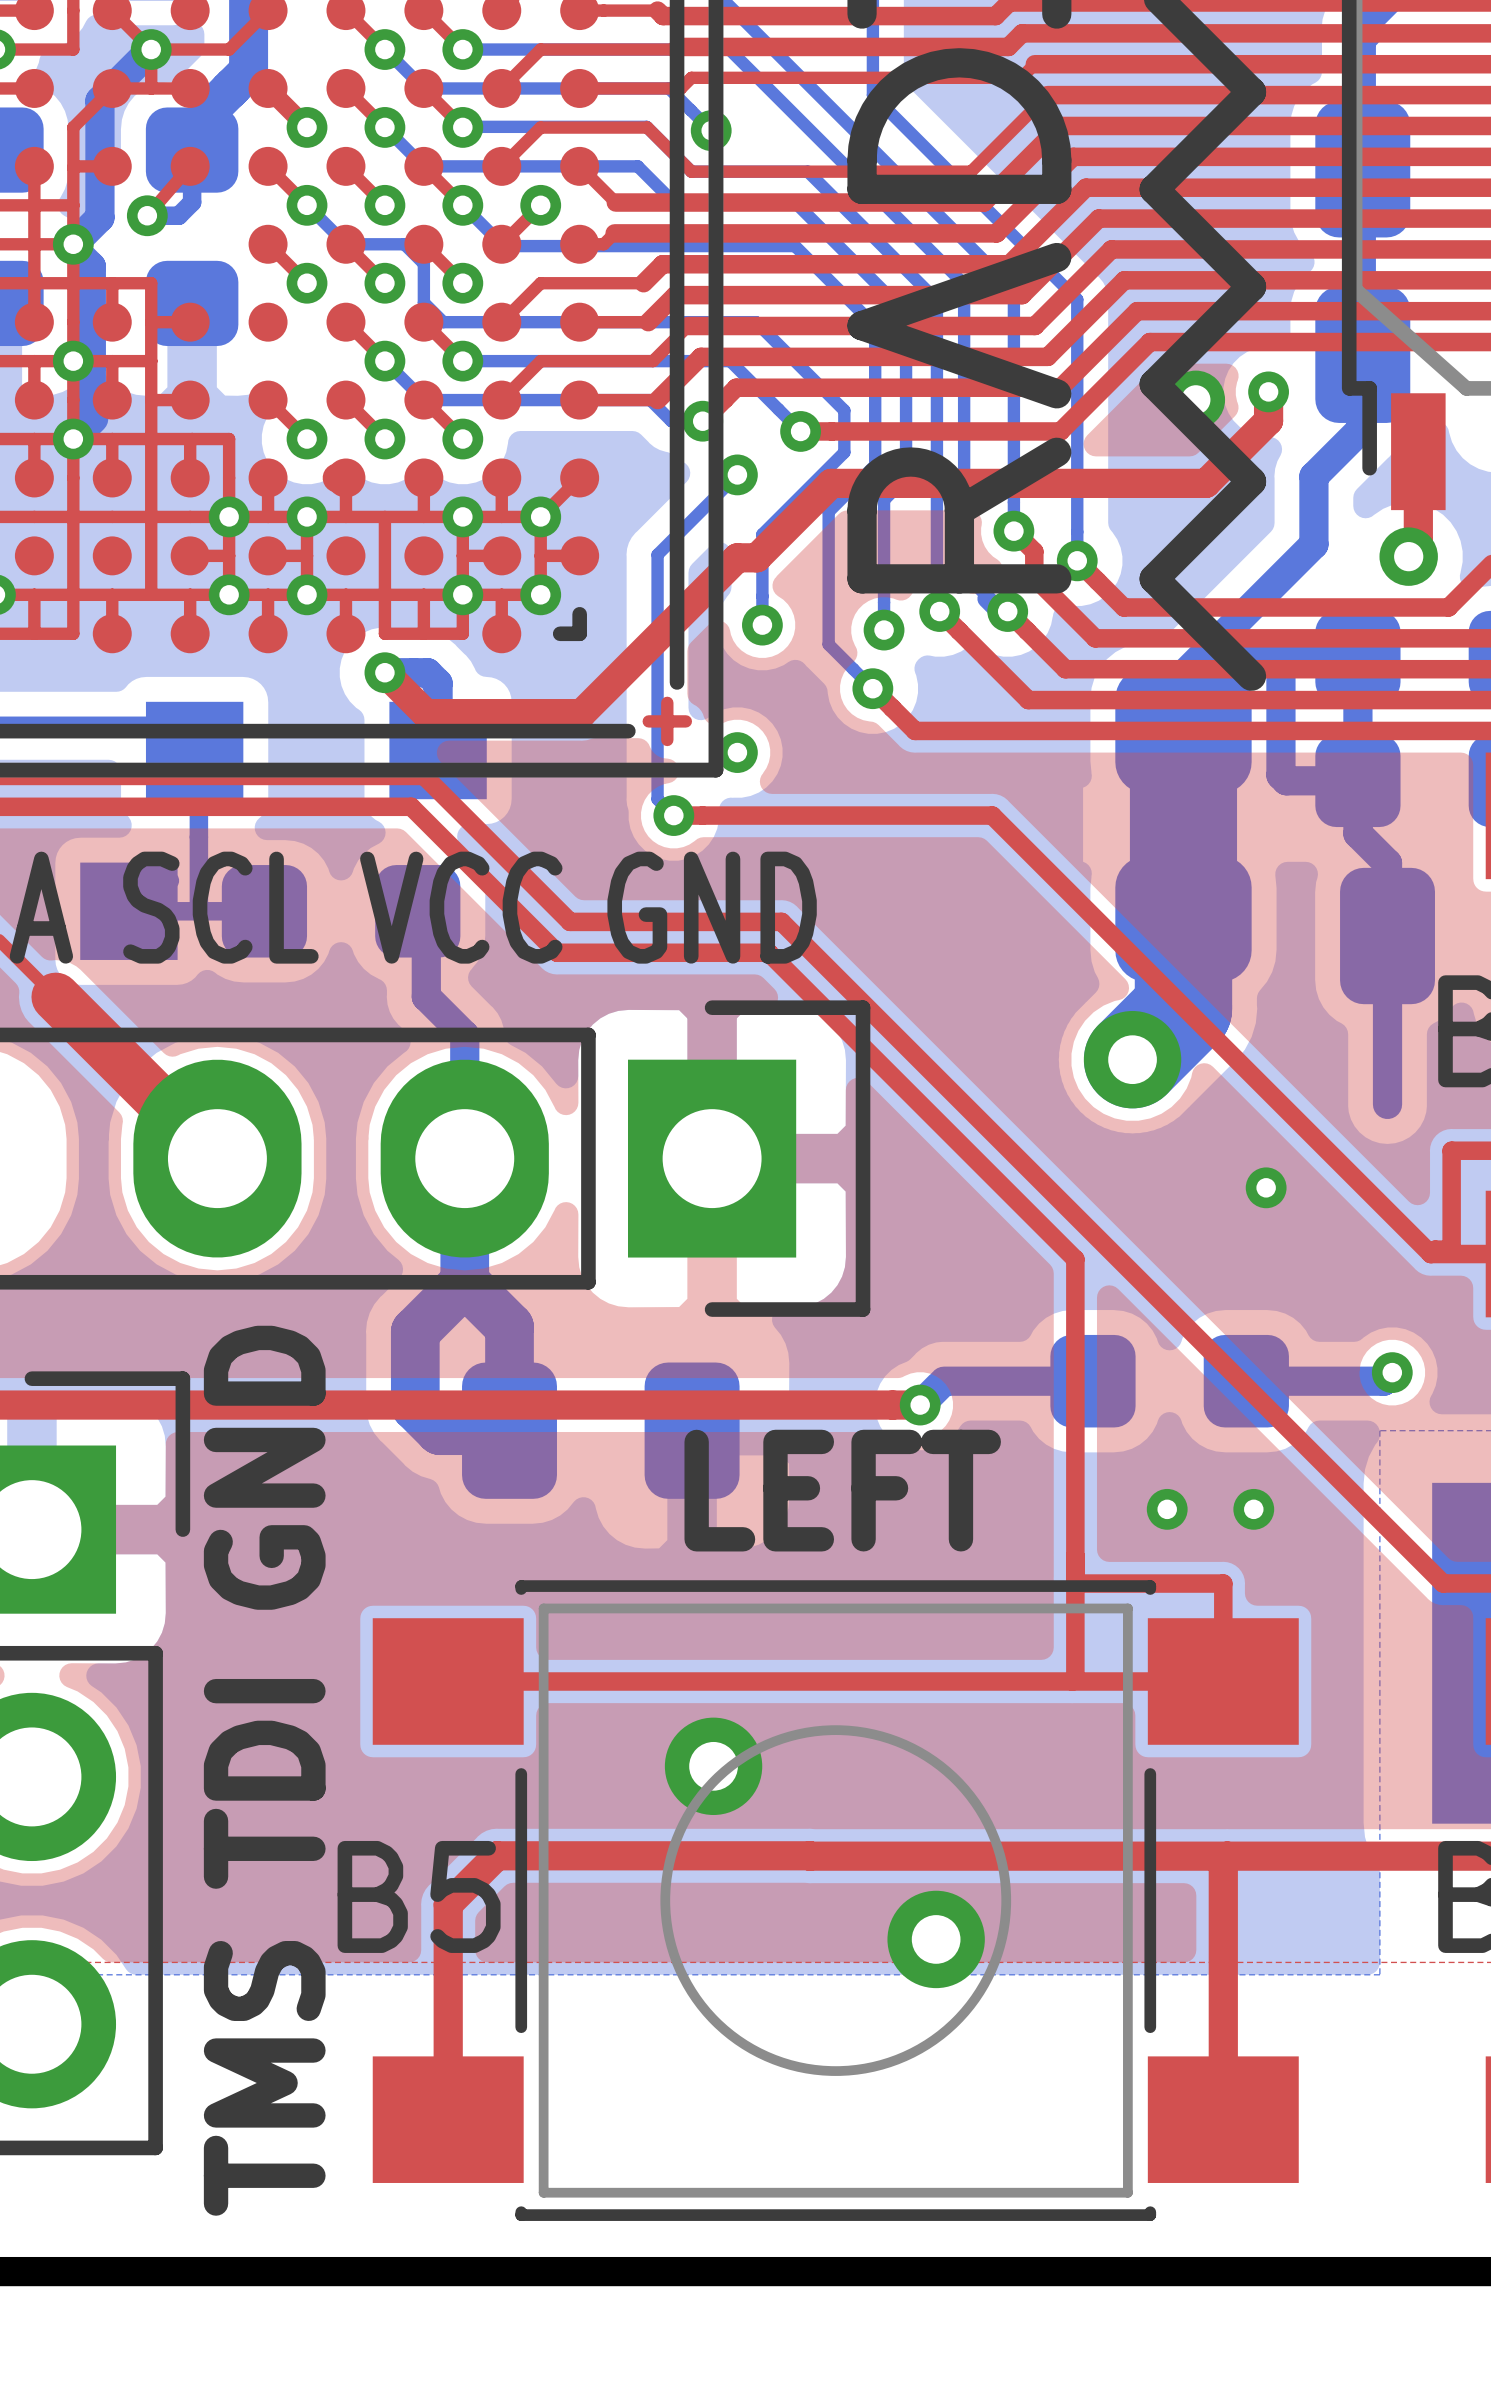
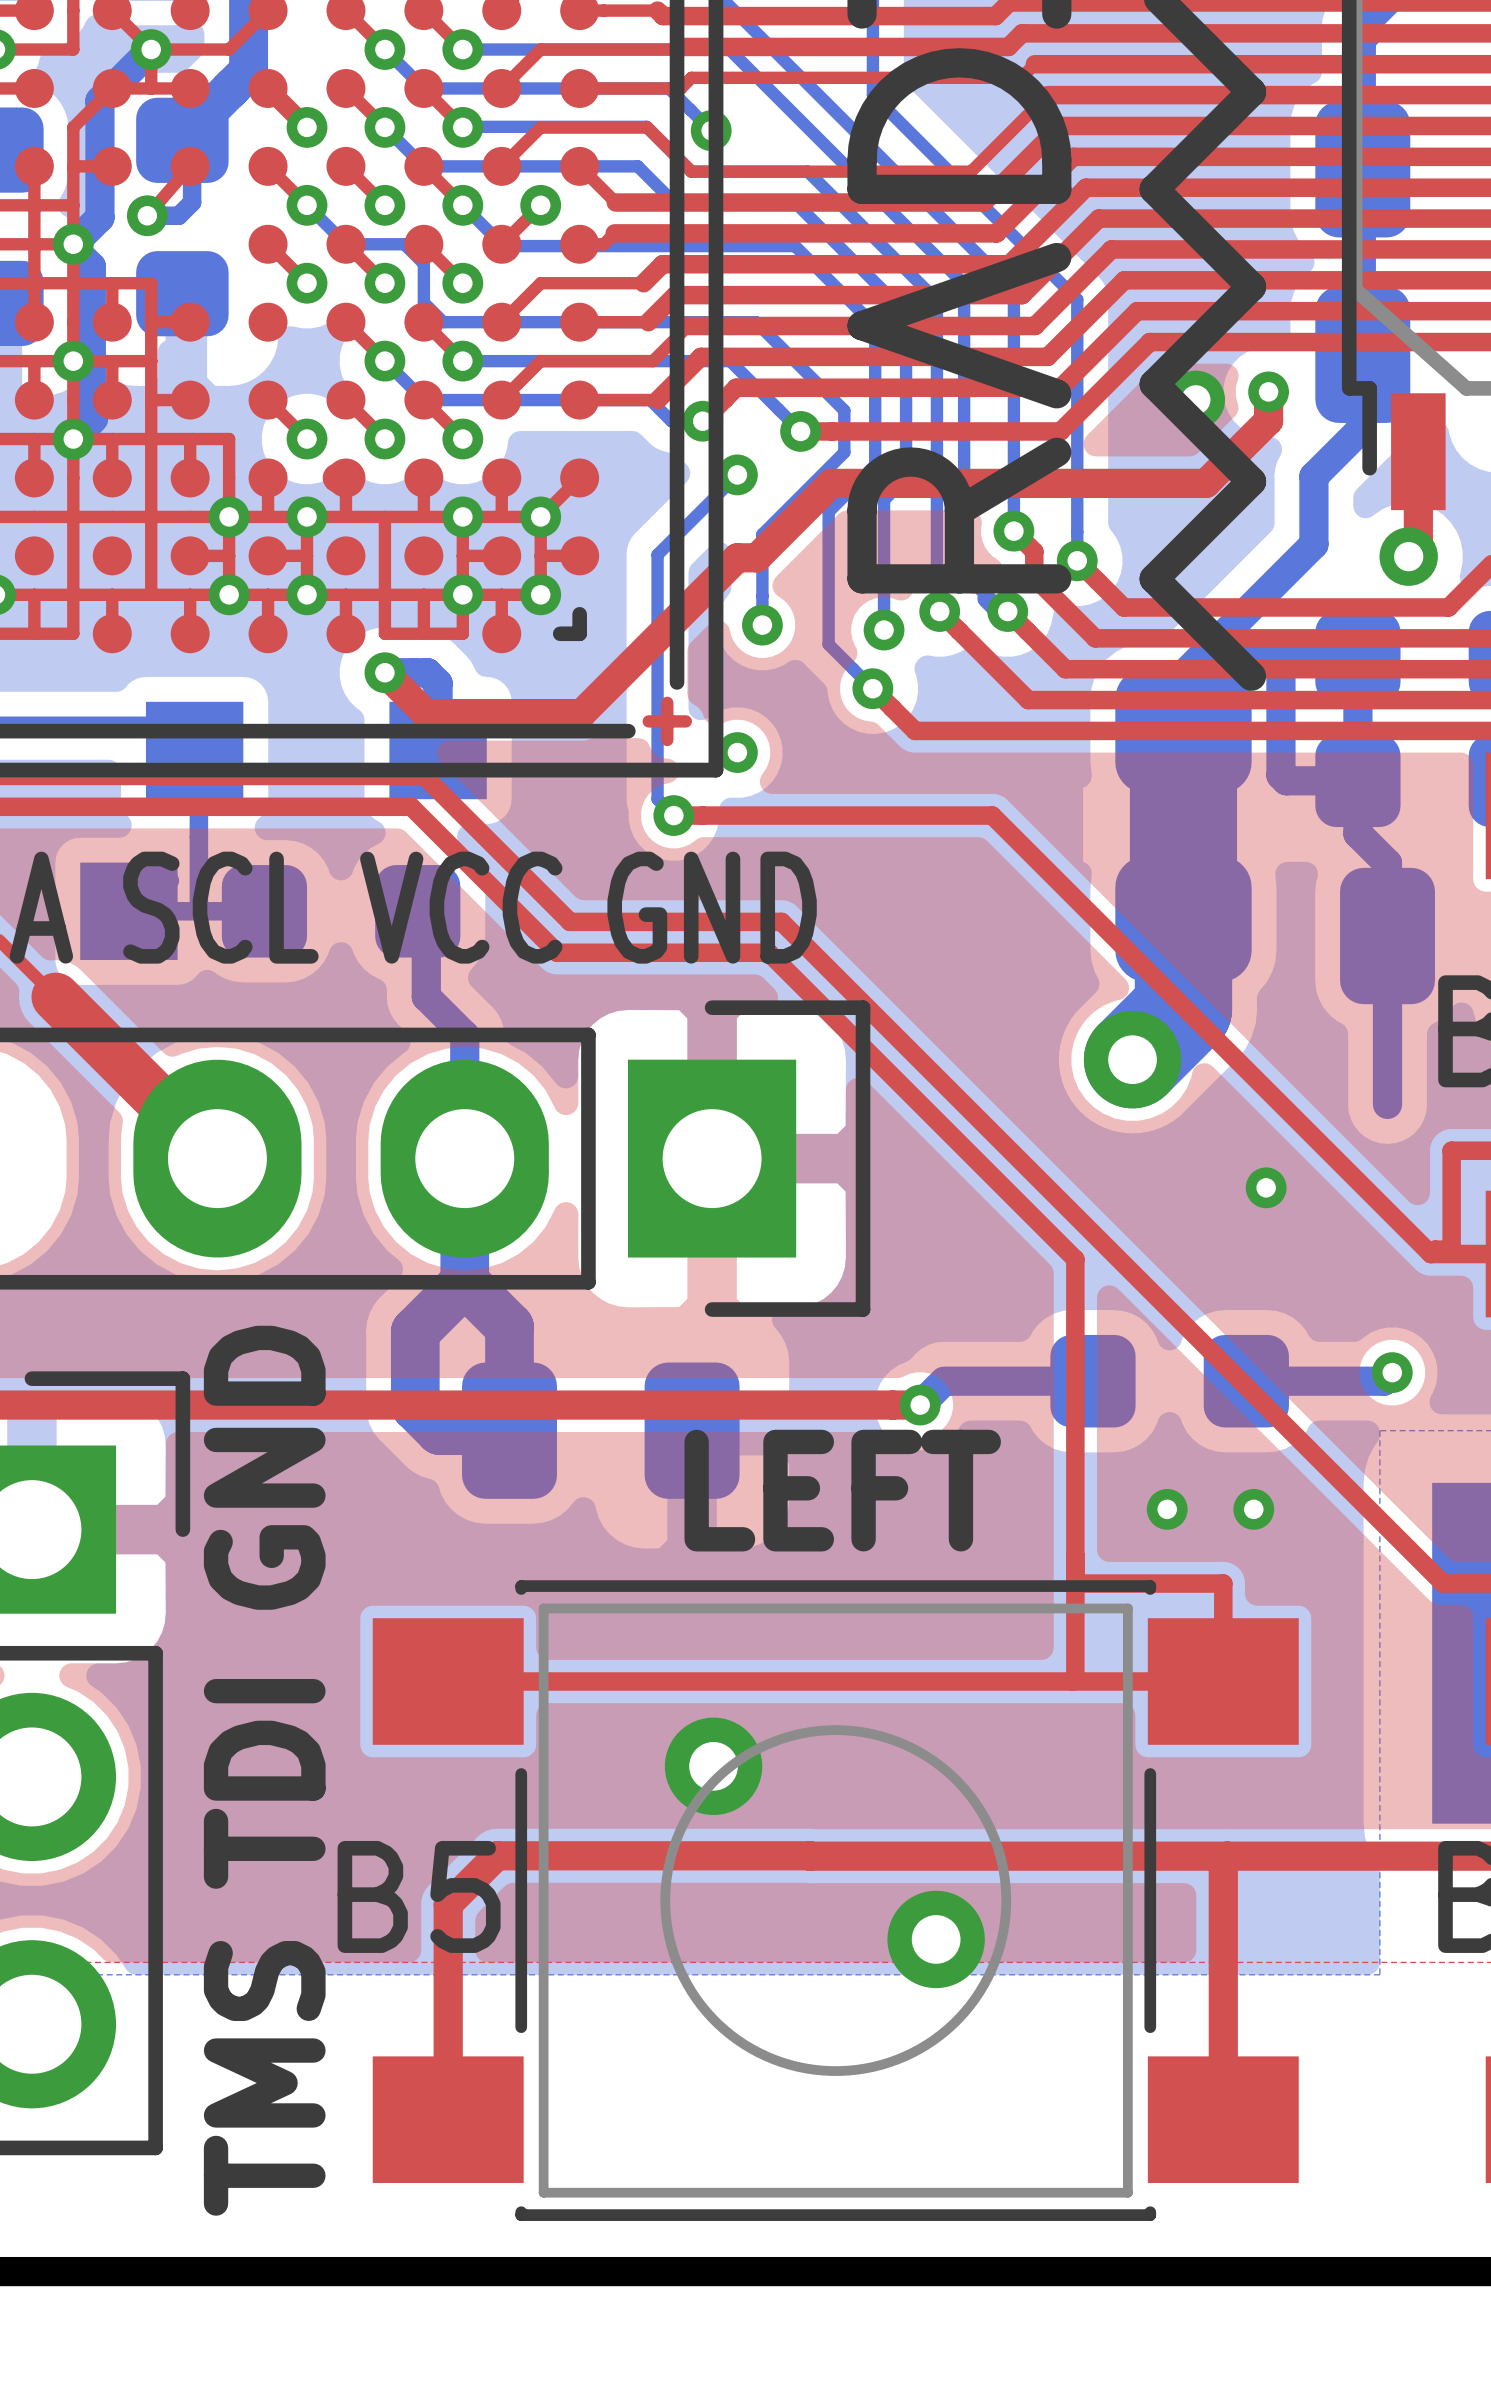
part position: (192, 226) -> (182, 217)

